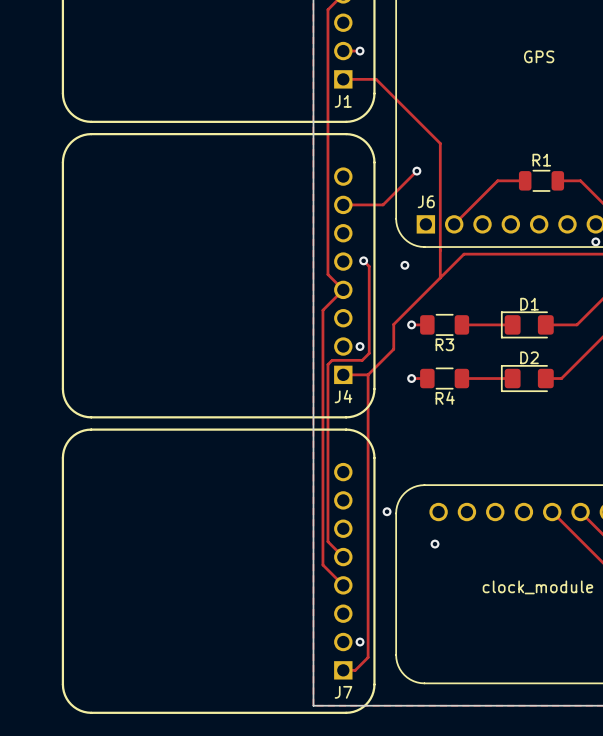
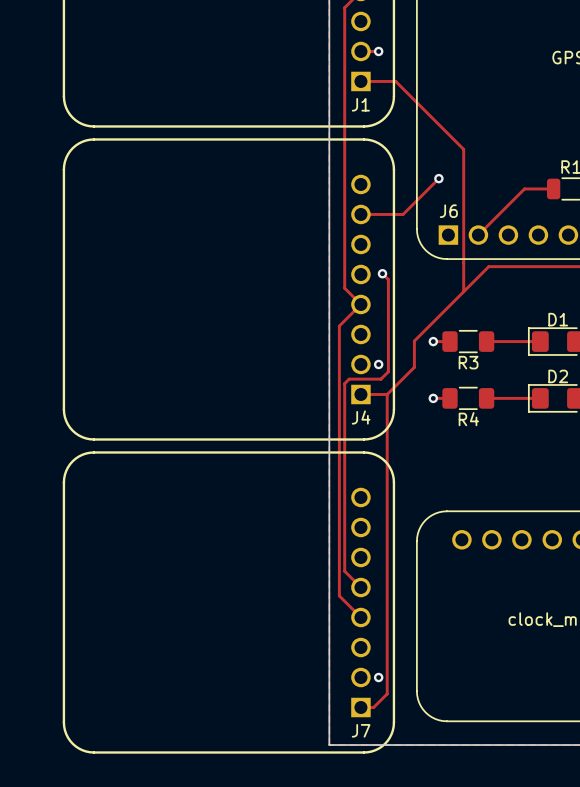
via: (404, 265) -> none
via: (387, 511) -> none
via: (435, 544) -> none

